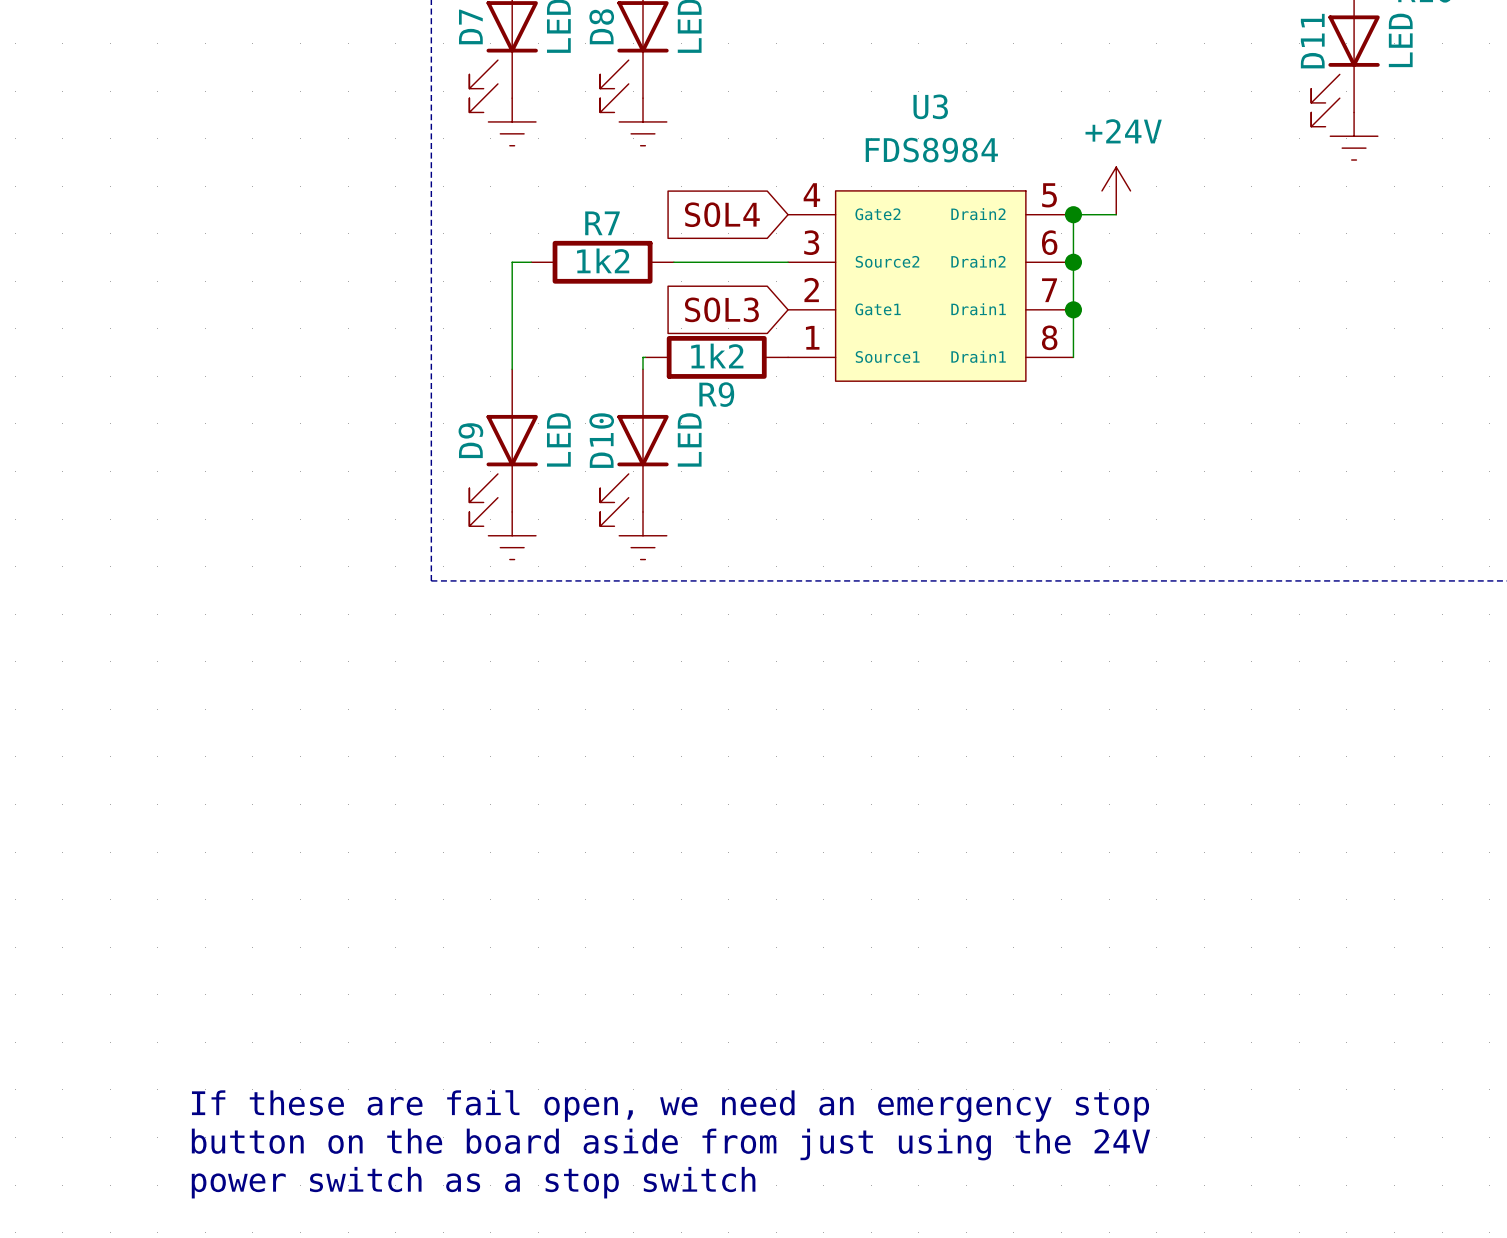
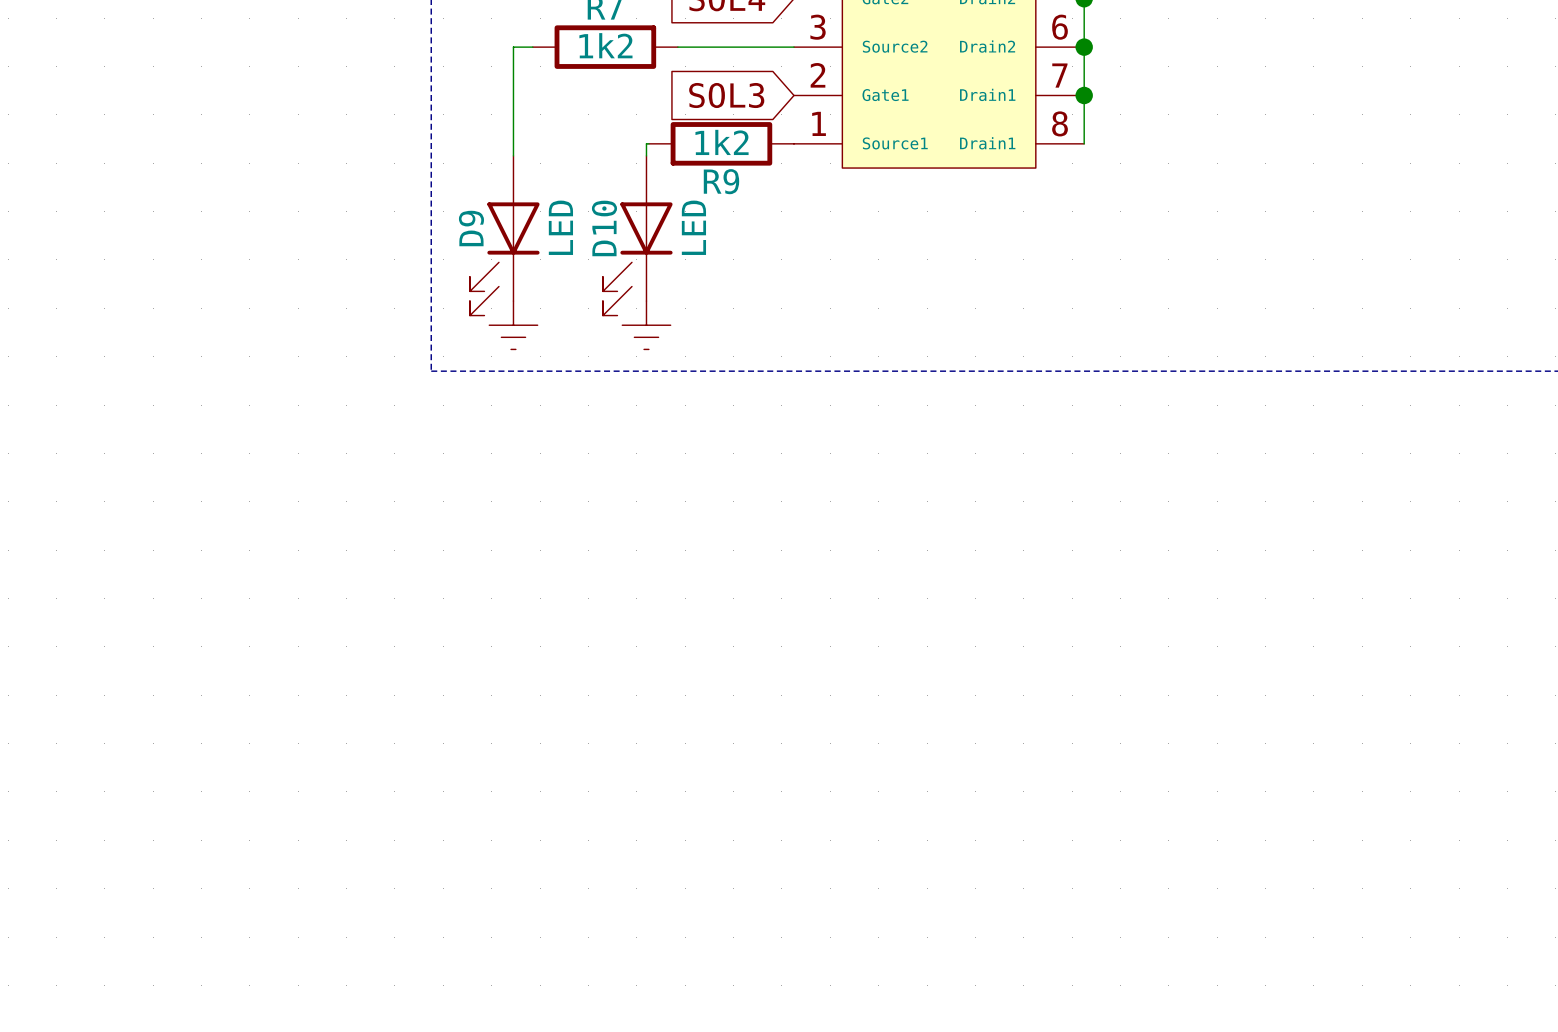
text: If these are fail open, we need an emergency stop (670, 1106) -> none
text: button on the board aside from just using the 24V (671, 1144) -> none
text: power switch as a stop switch (473, 1182) -> none

